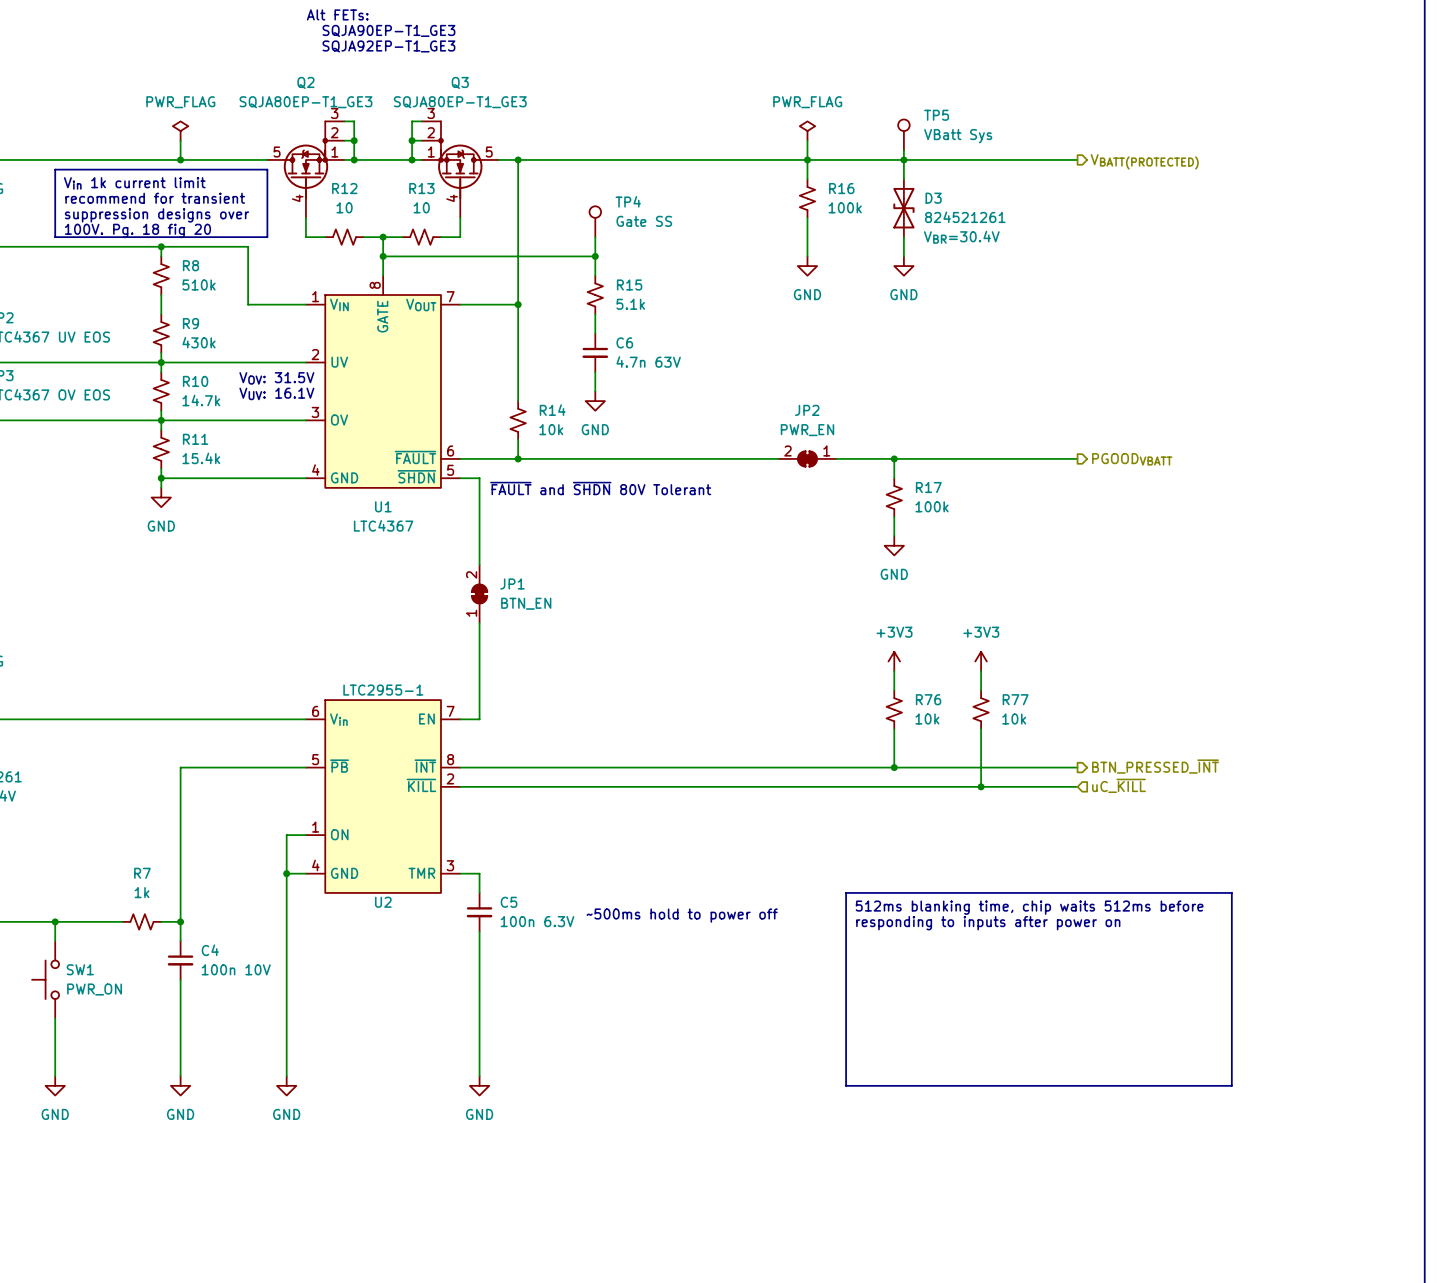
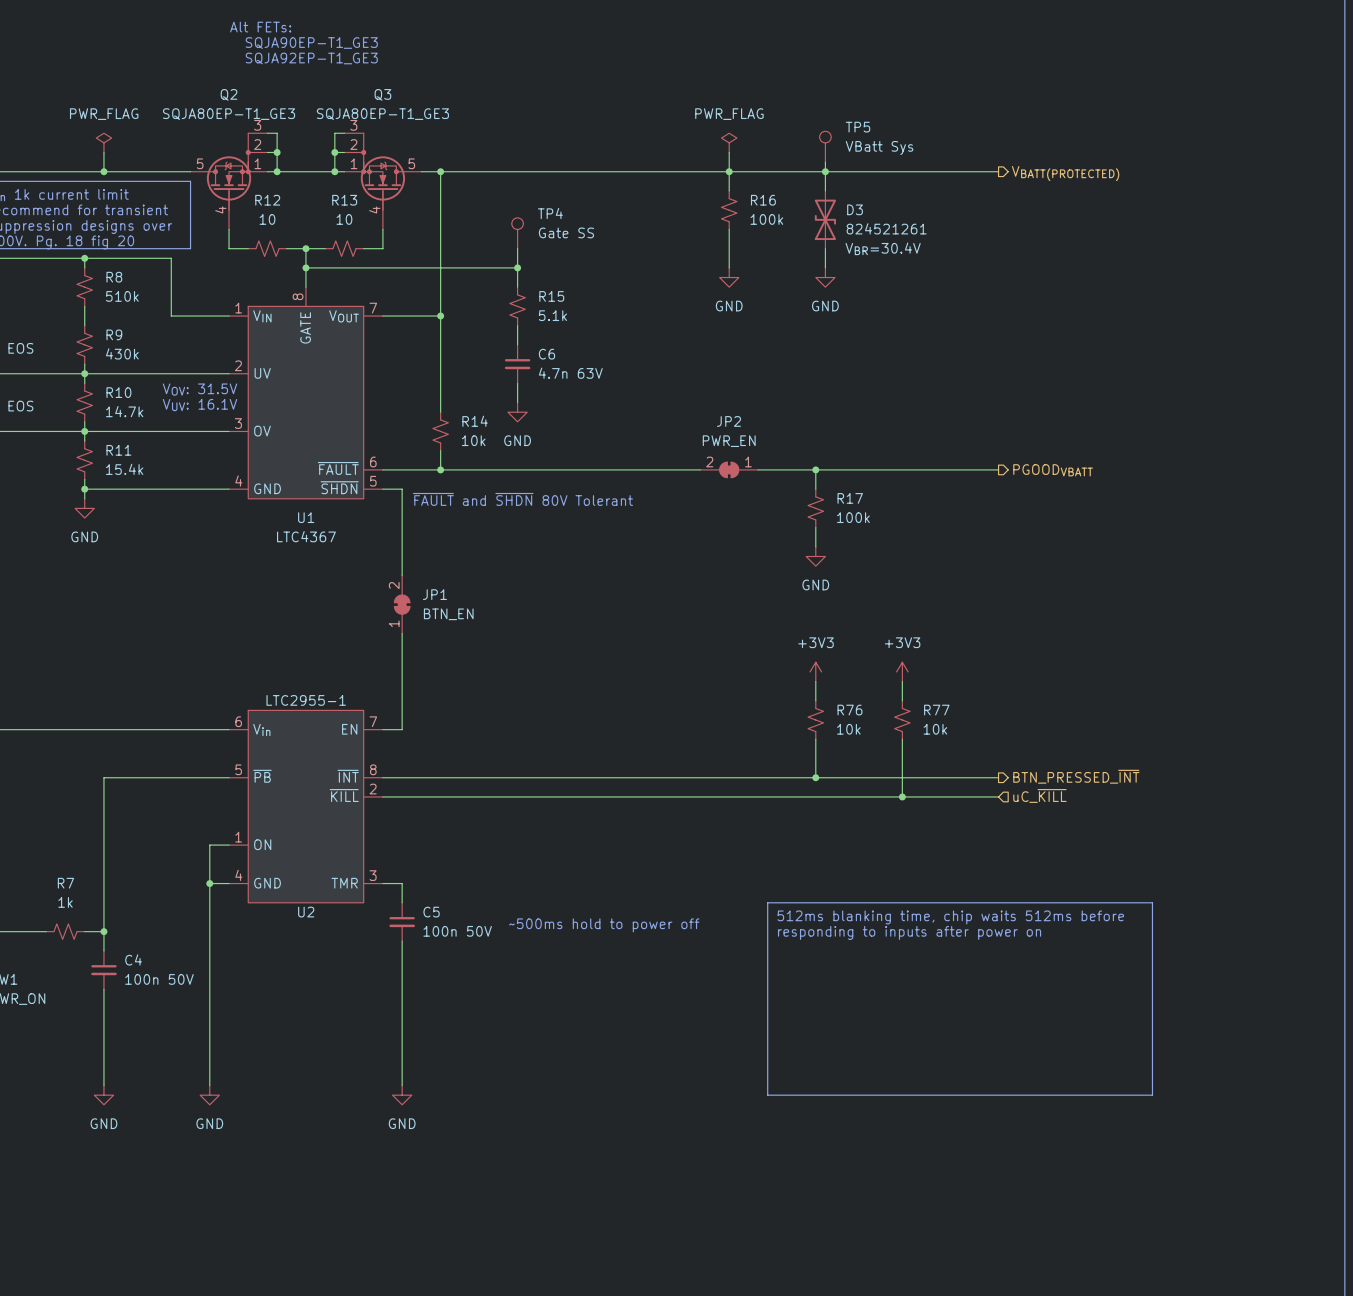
C5 value: 100n 6.3V (537, 921) -> 100n 50V (457, 931)
C4 value: 100n 10V (236, 969) -> 100n 50V (159, 979)

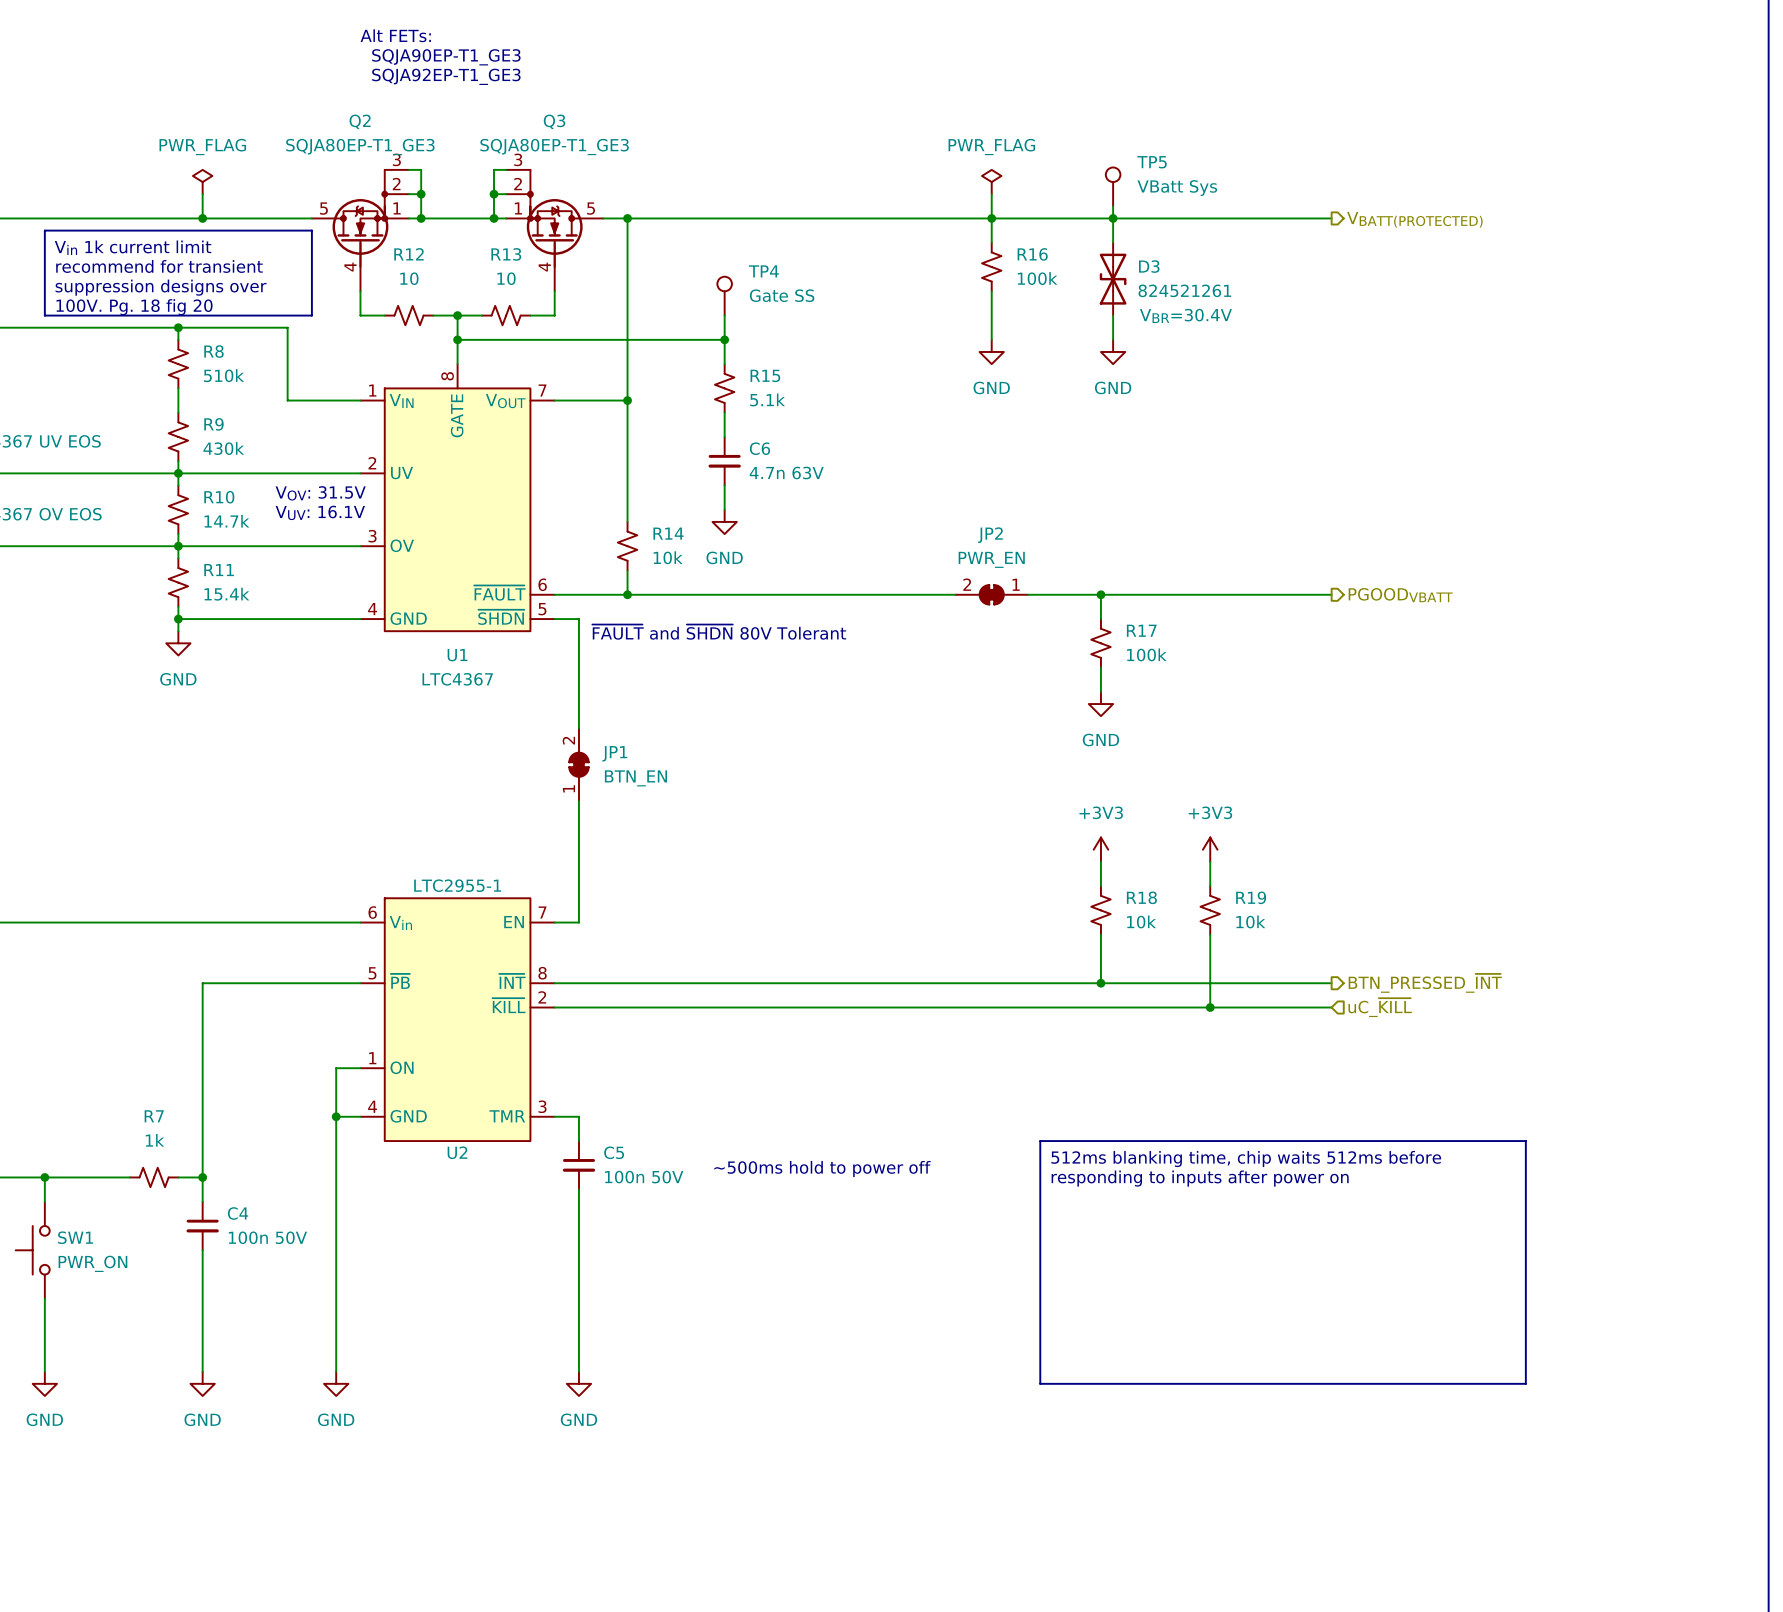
R76 name: R76 (849, 710) -> R18 (1141, 897)
R77 name: R77 (936, 710) -> R19 (1251, 897)

